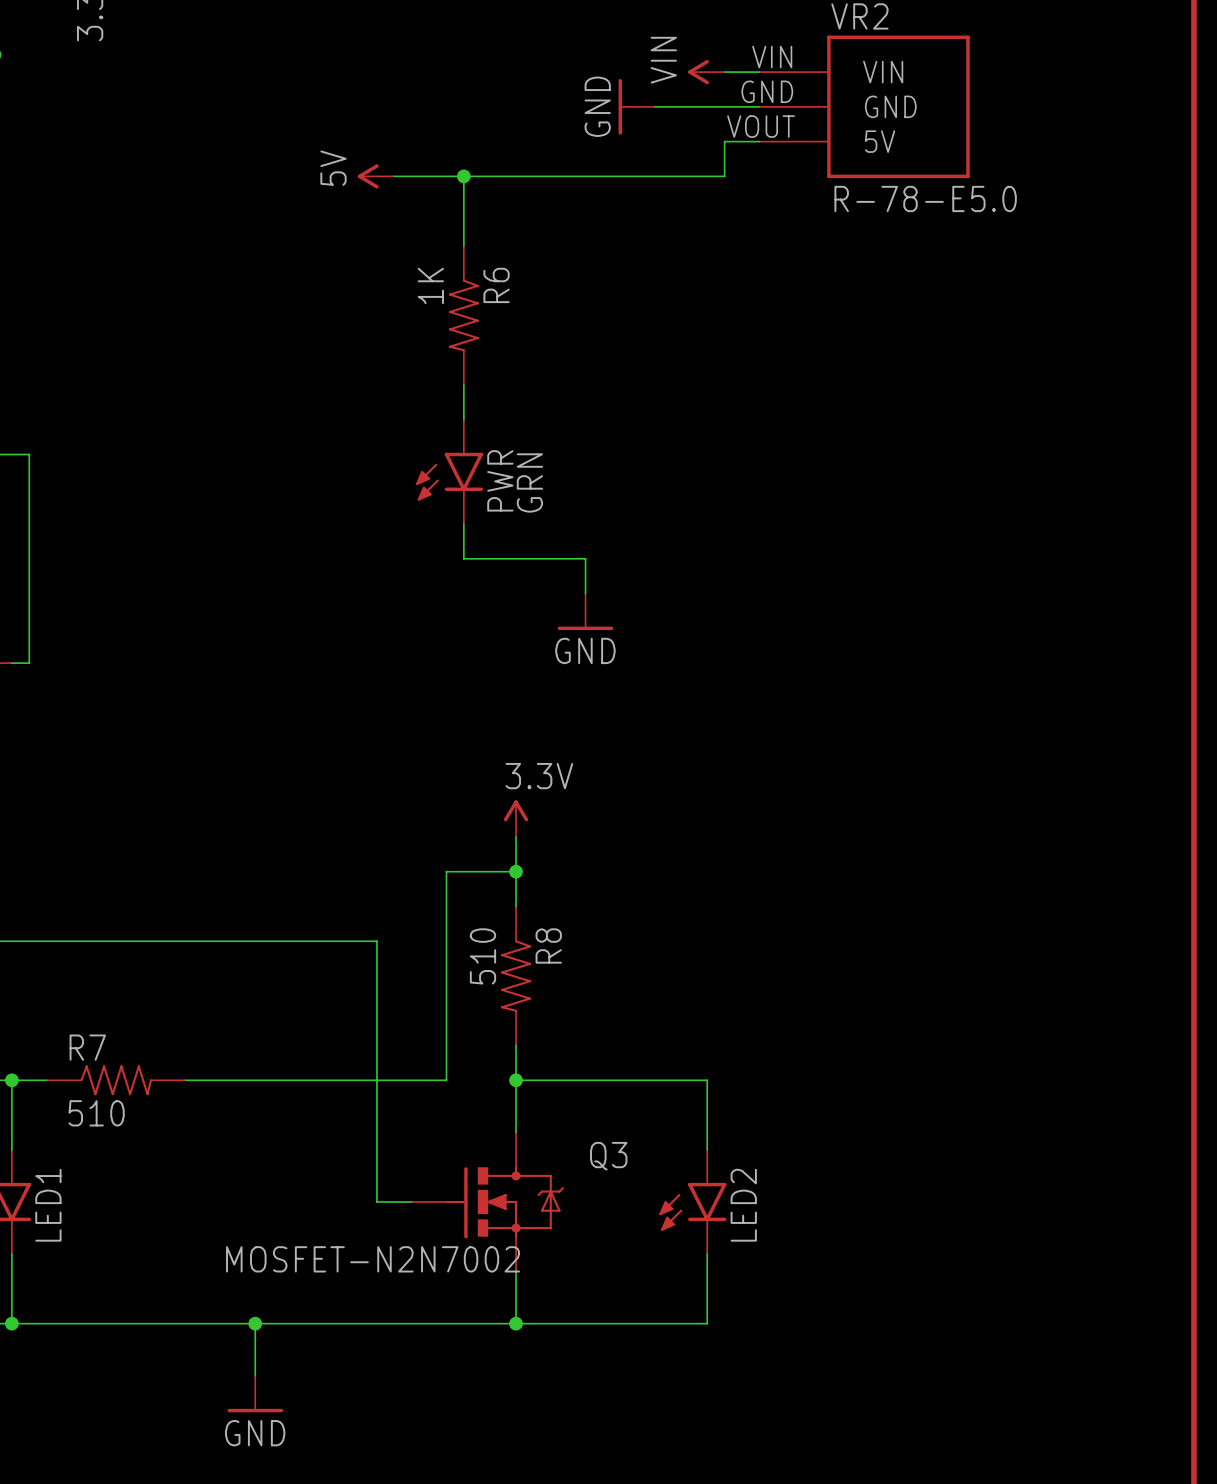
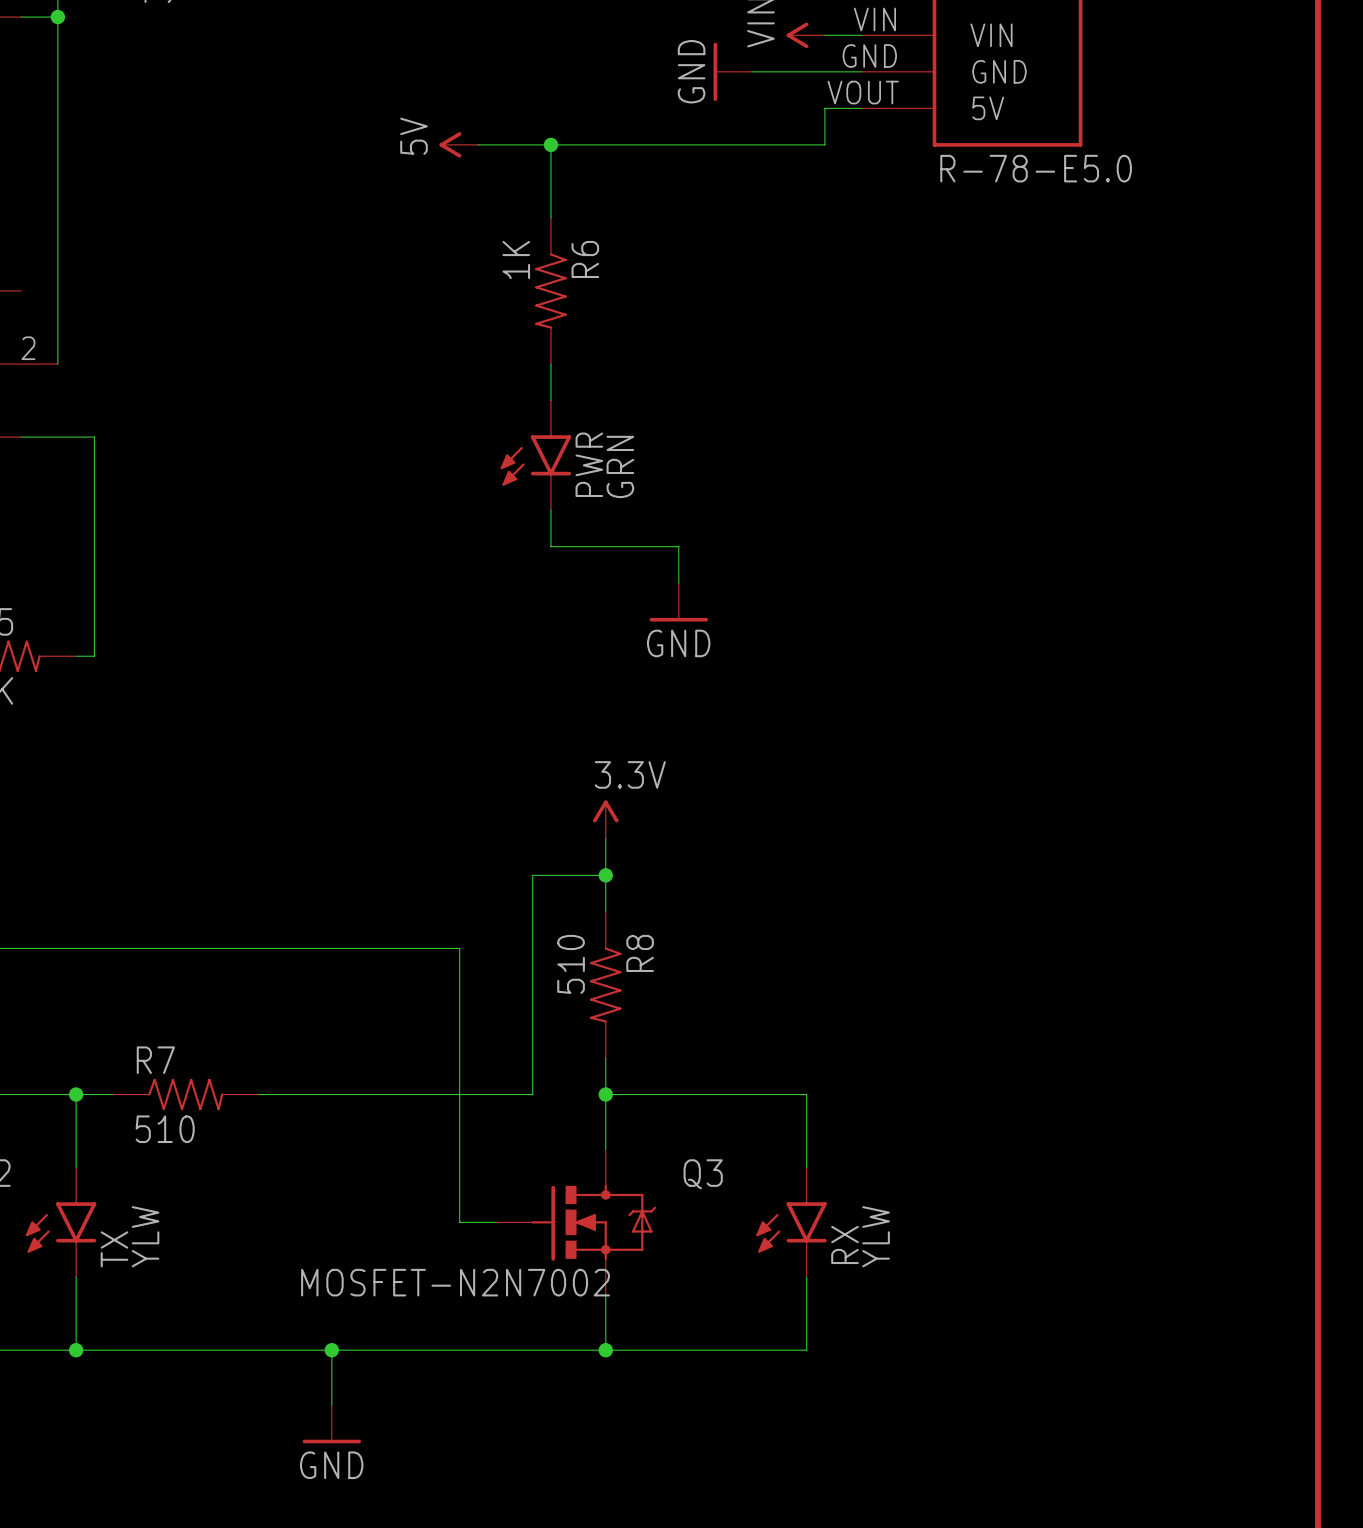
LED1 name: LED1 (48, 1205) -> TX (114, 1249)
LED2 name: LED2 (743, 1205) -> RX (845, 1244)
LED1 value: none -> YLW (145, 1236)
LED2 value: none -> YLW (876, 1236)

